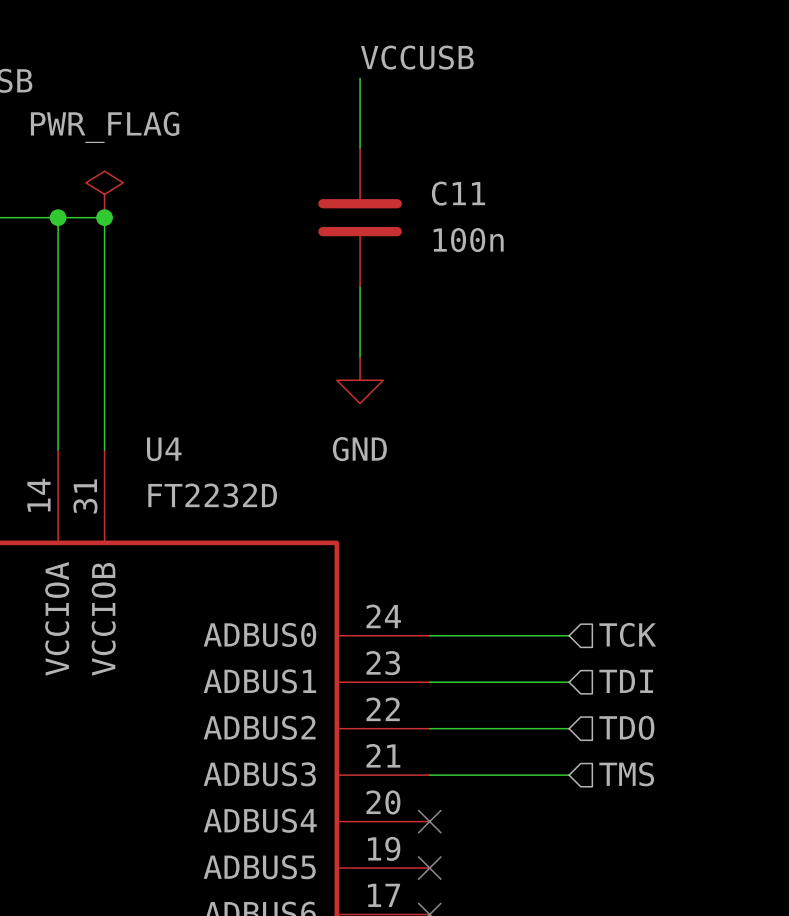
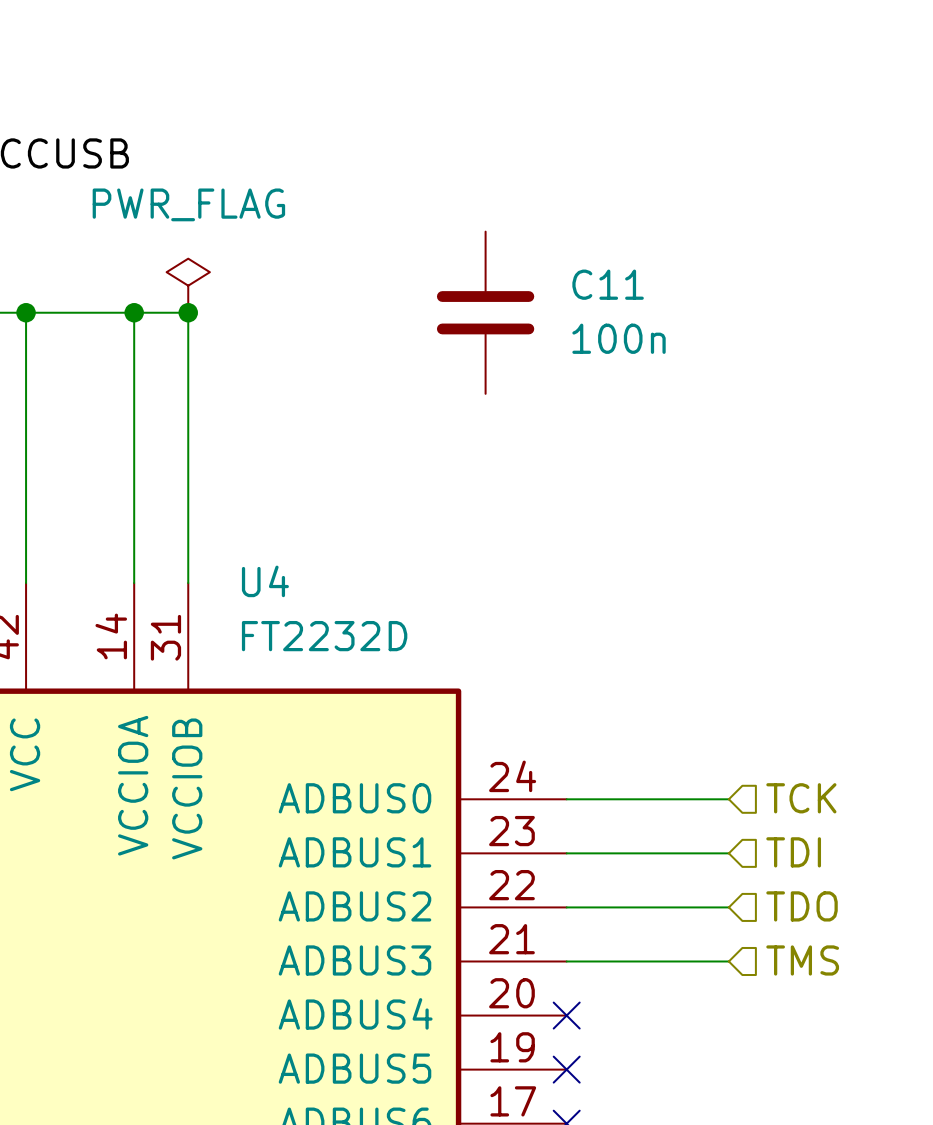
label: VCCUSB (417, 57) -> none
wire: (360, 78) (360, 147) -> none
wire: (360, 287) (360, 357) -> none
power symbol: GND (360, 380) -> none

